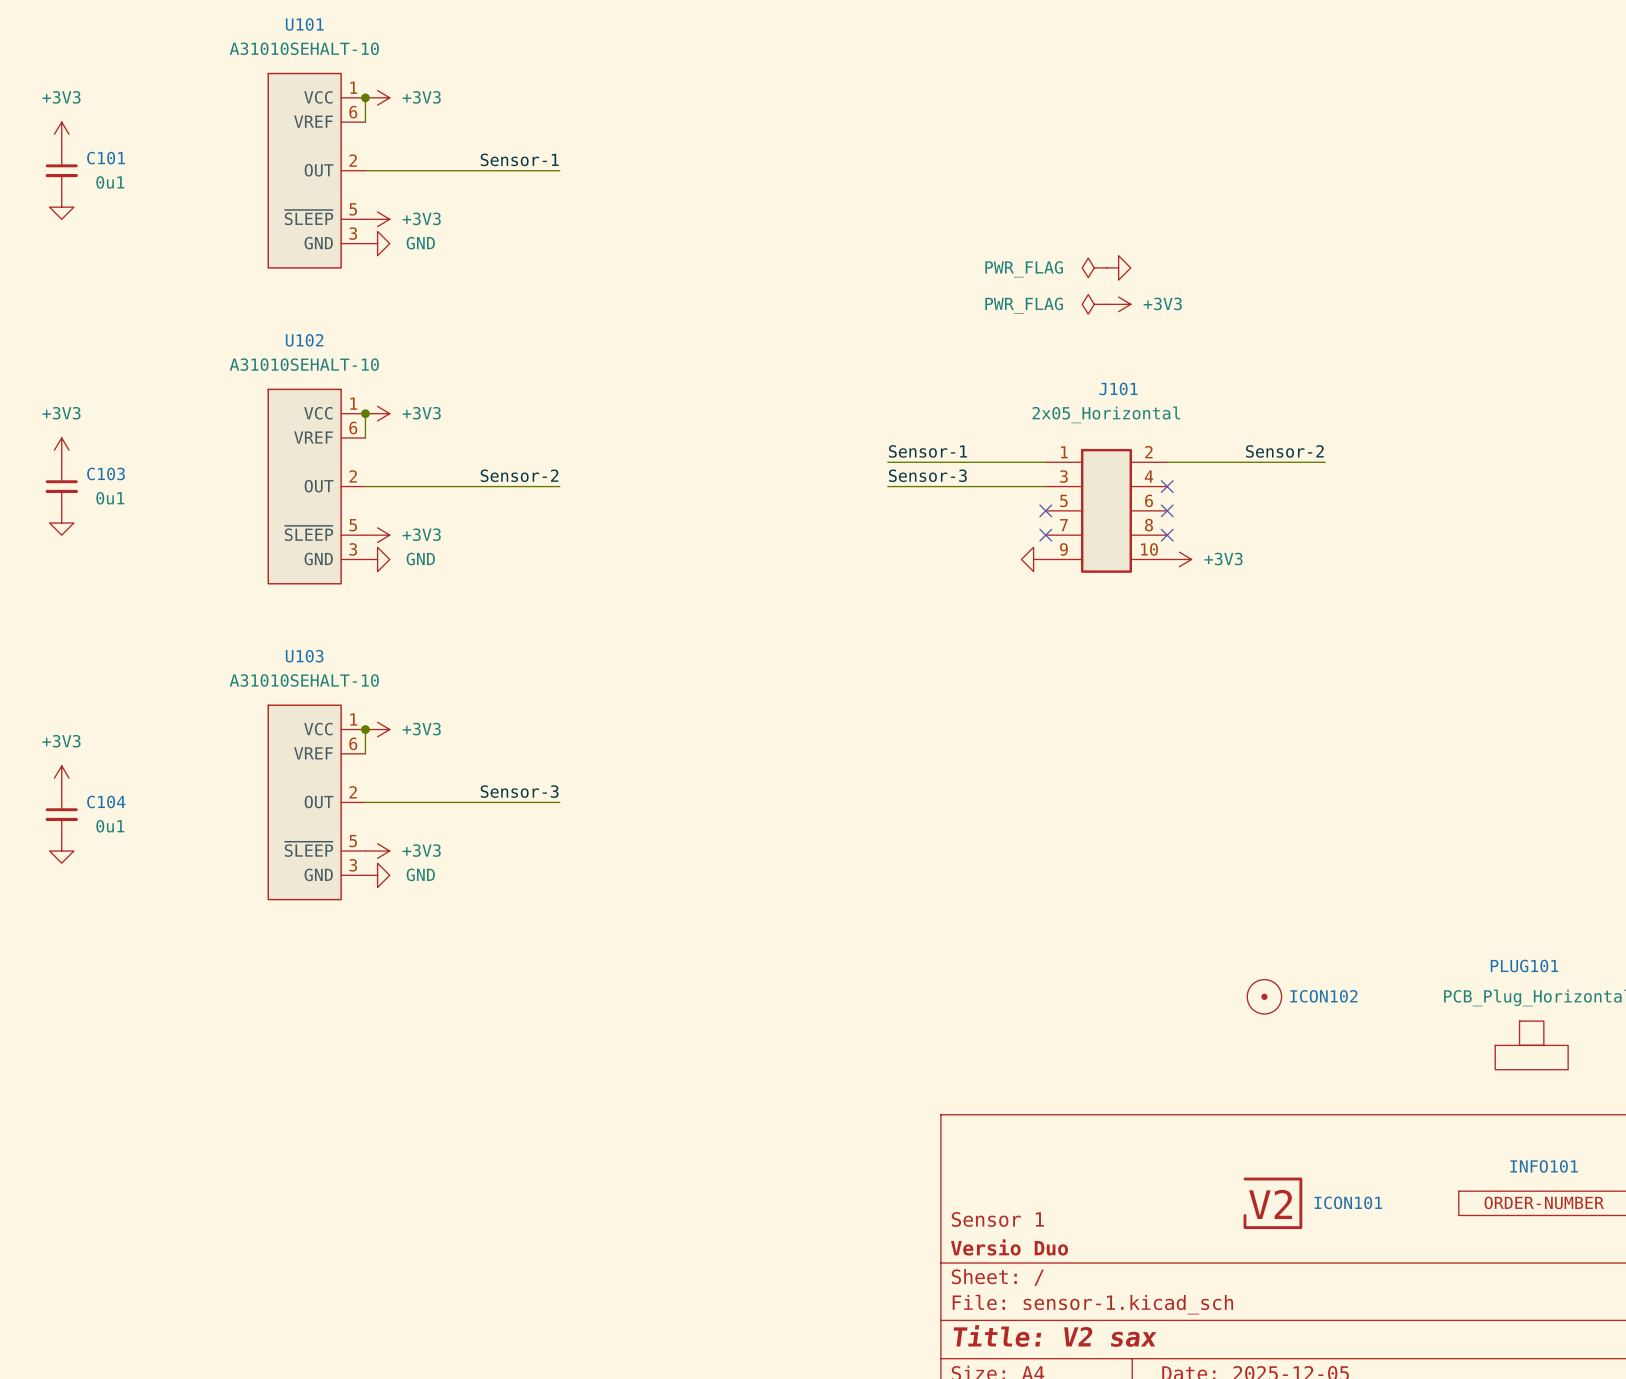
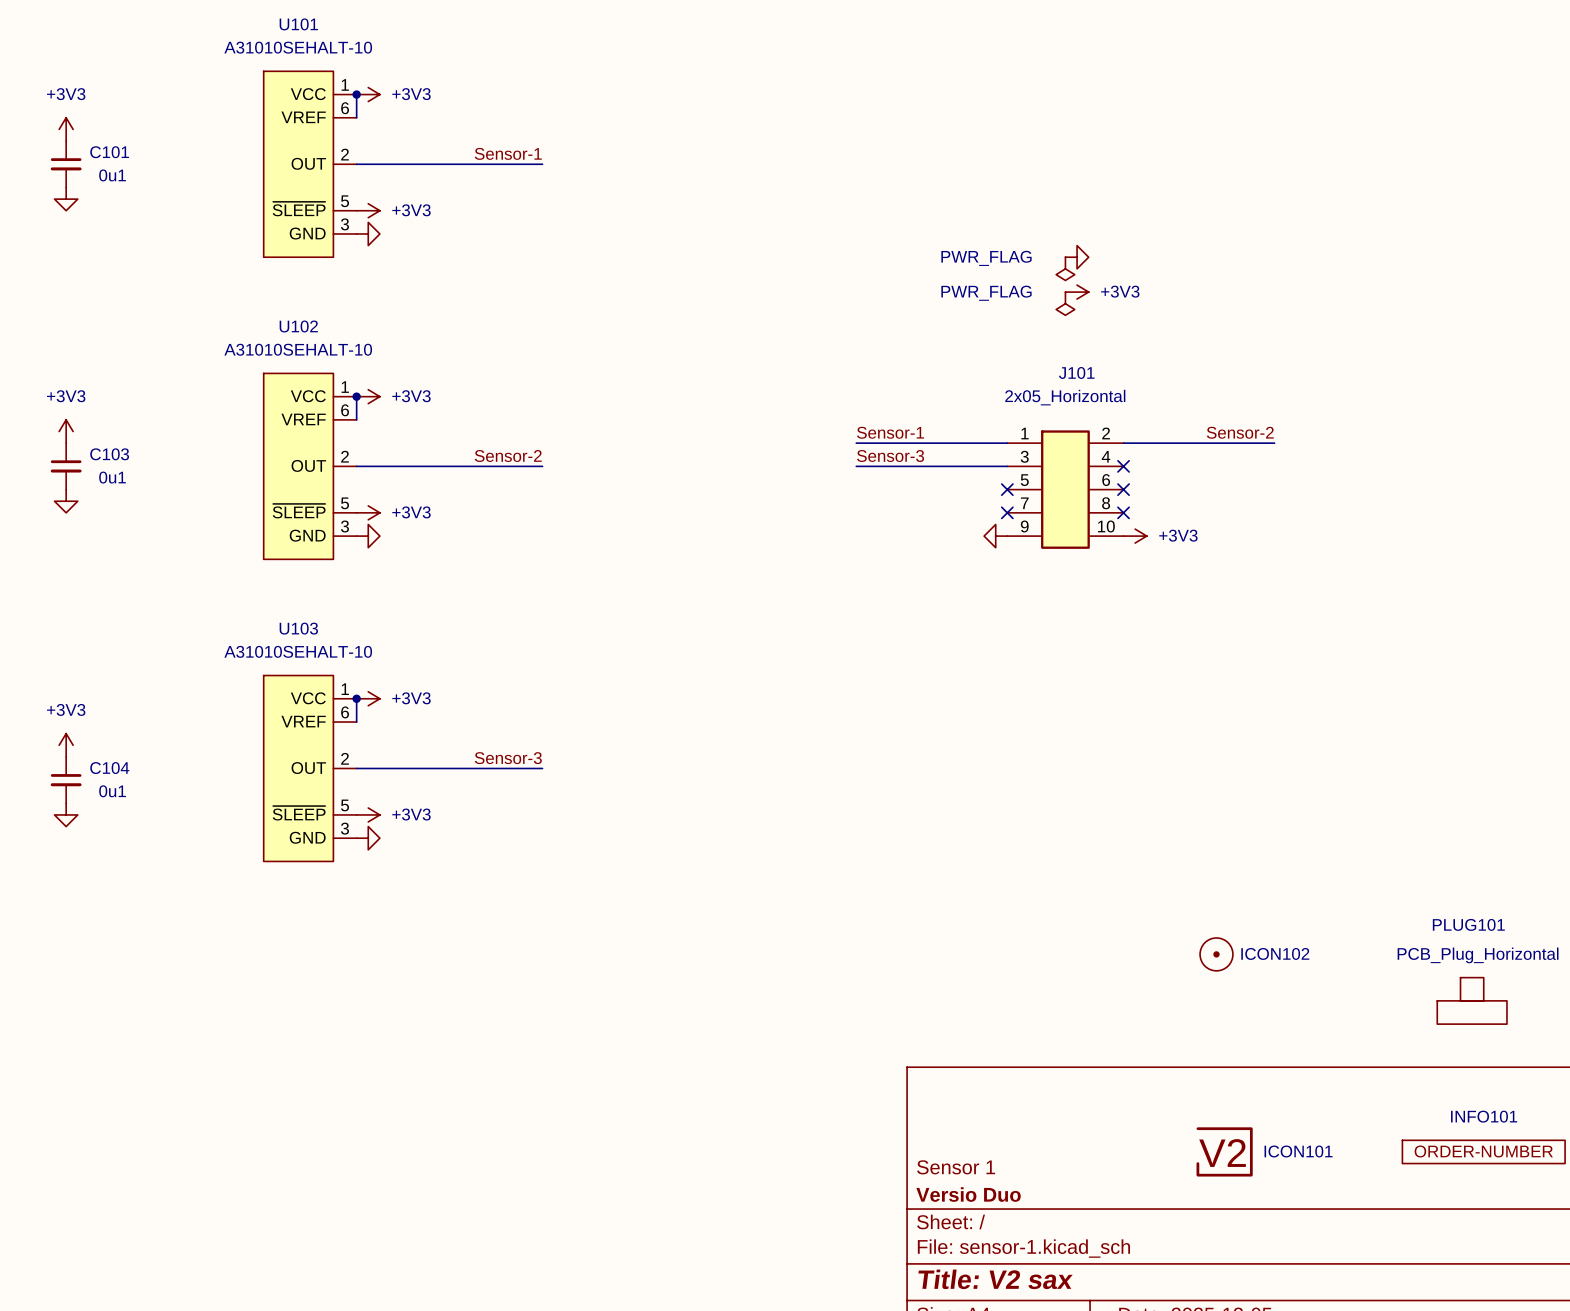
power symbol text: GND (420, 243) -> none
power symbol: PWR_FLAG (1094, 267) -> none
power symbol: none -> PWR_FLAG (1065, 268)
power symbol: PWR_FLAG (1094, 304) -> none
power symbol: none -> PWR_FLAG (1065, 303)
power symbol text: GND (420, 559) -> none
power symbol text: GND (420, 874) -> none

